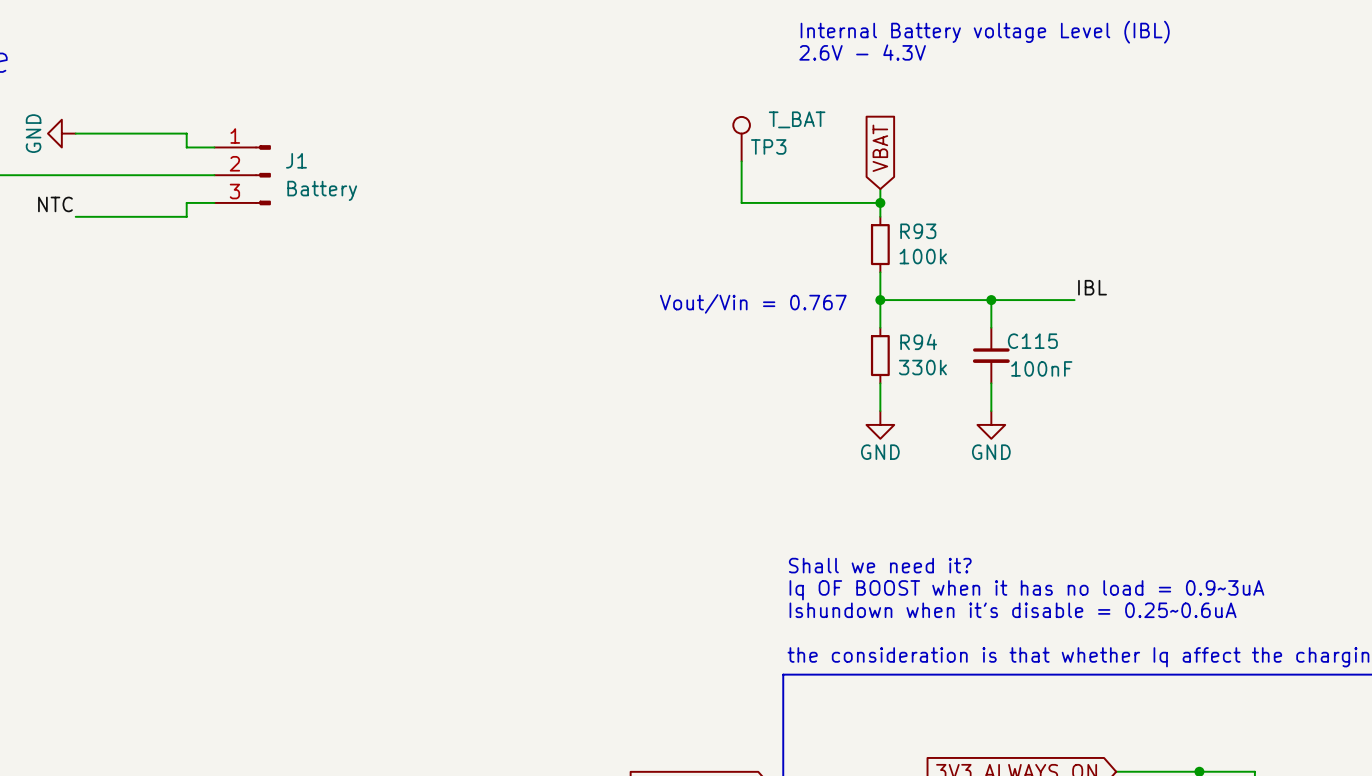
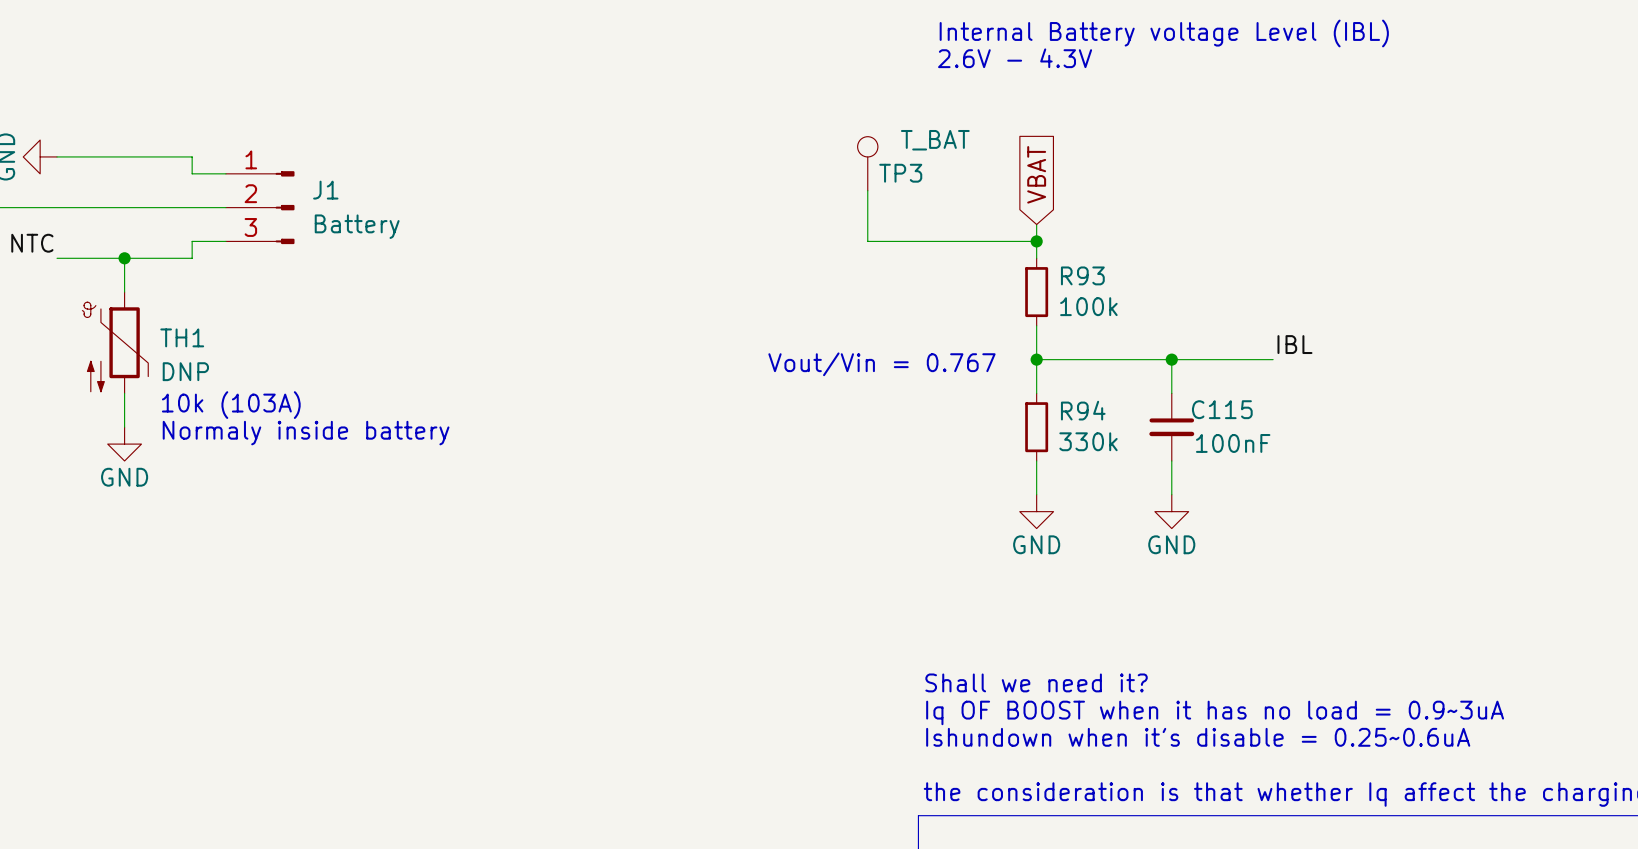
wire: none -> (124, 258) (124, 292)
junction: none -> (124, 258)
TH1: none -> DNP (115, 342)
wire: none -> (124, 393) (124, 427)
text: none -> 10k (103A) (231, 405)
text: none -> Normaly inside battery (306, 433)
power symbol: none -> GND (124, 444)

